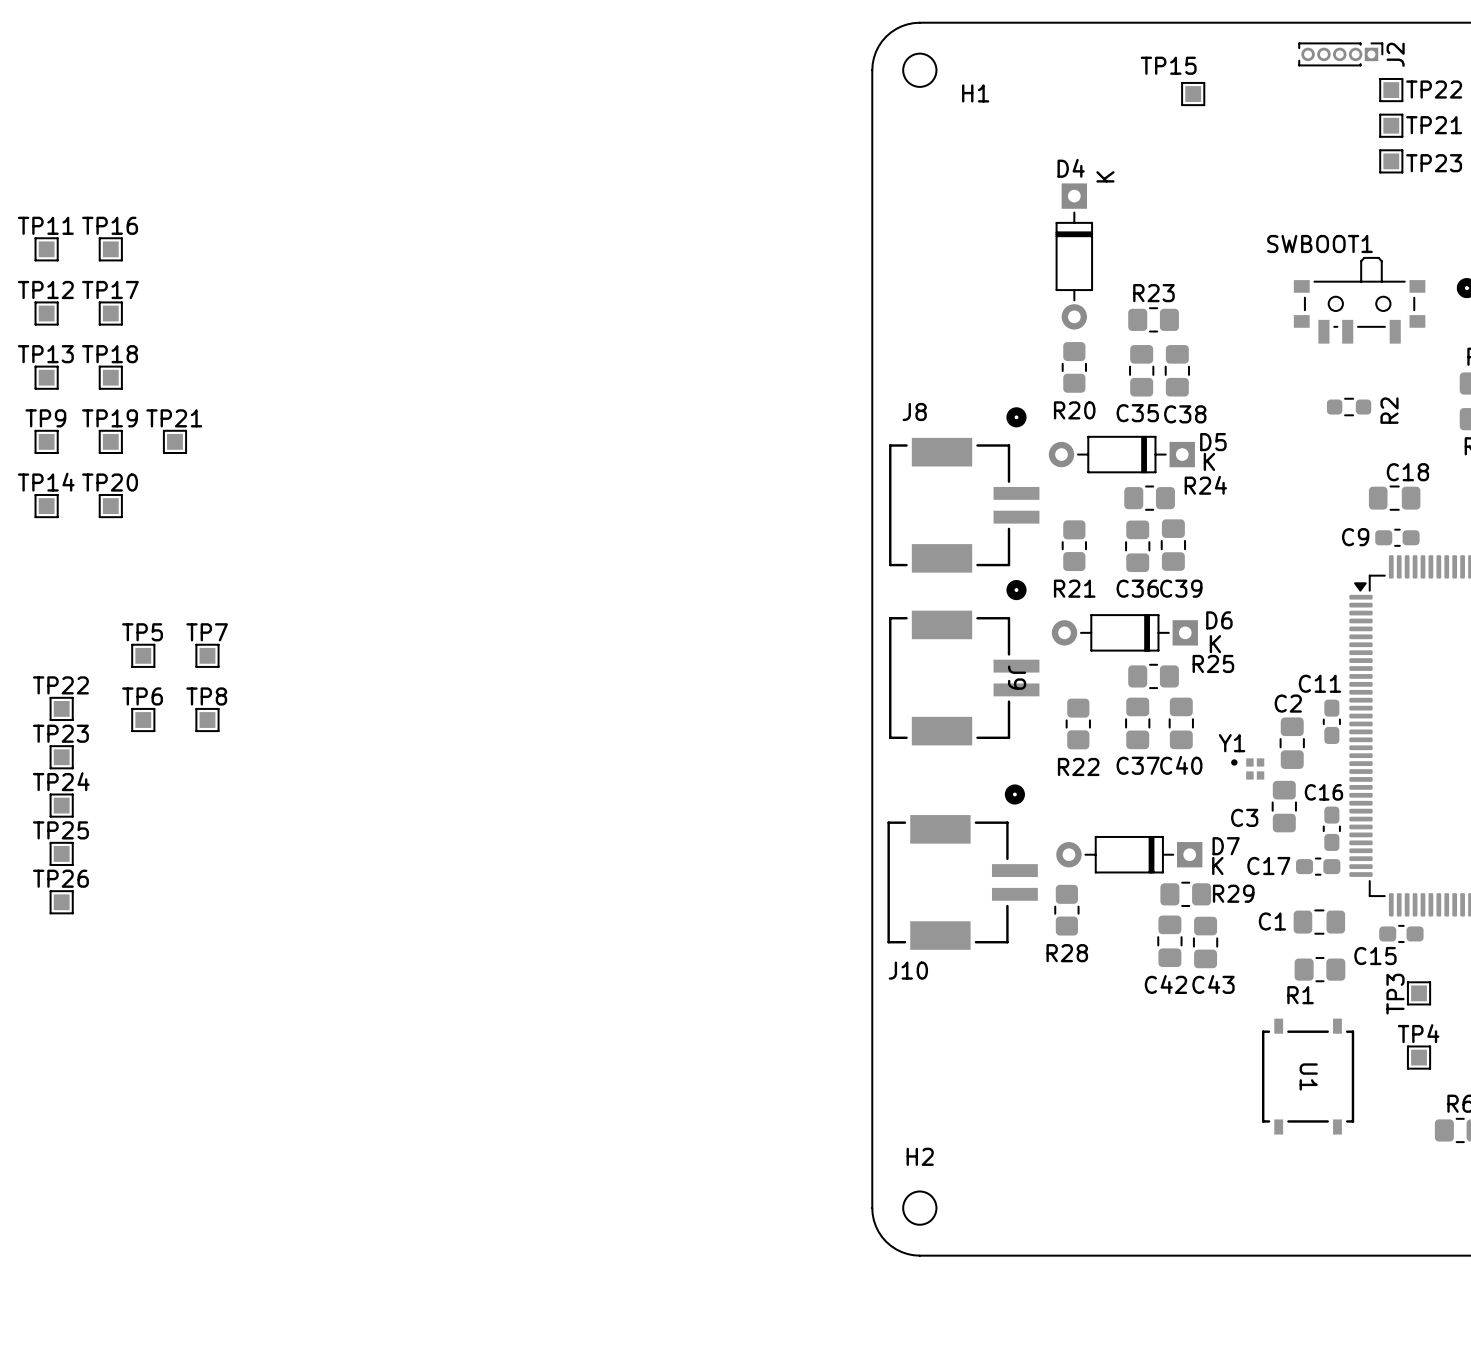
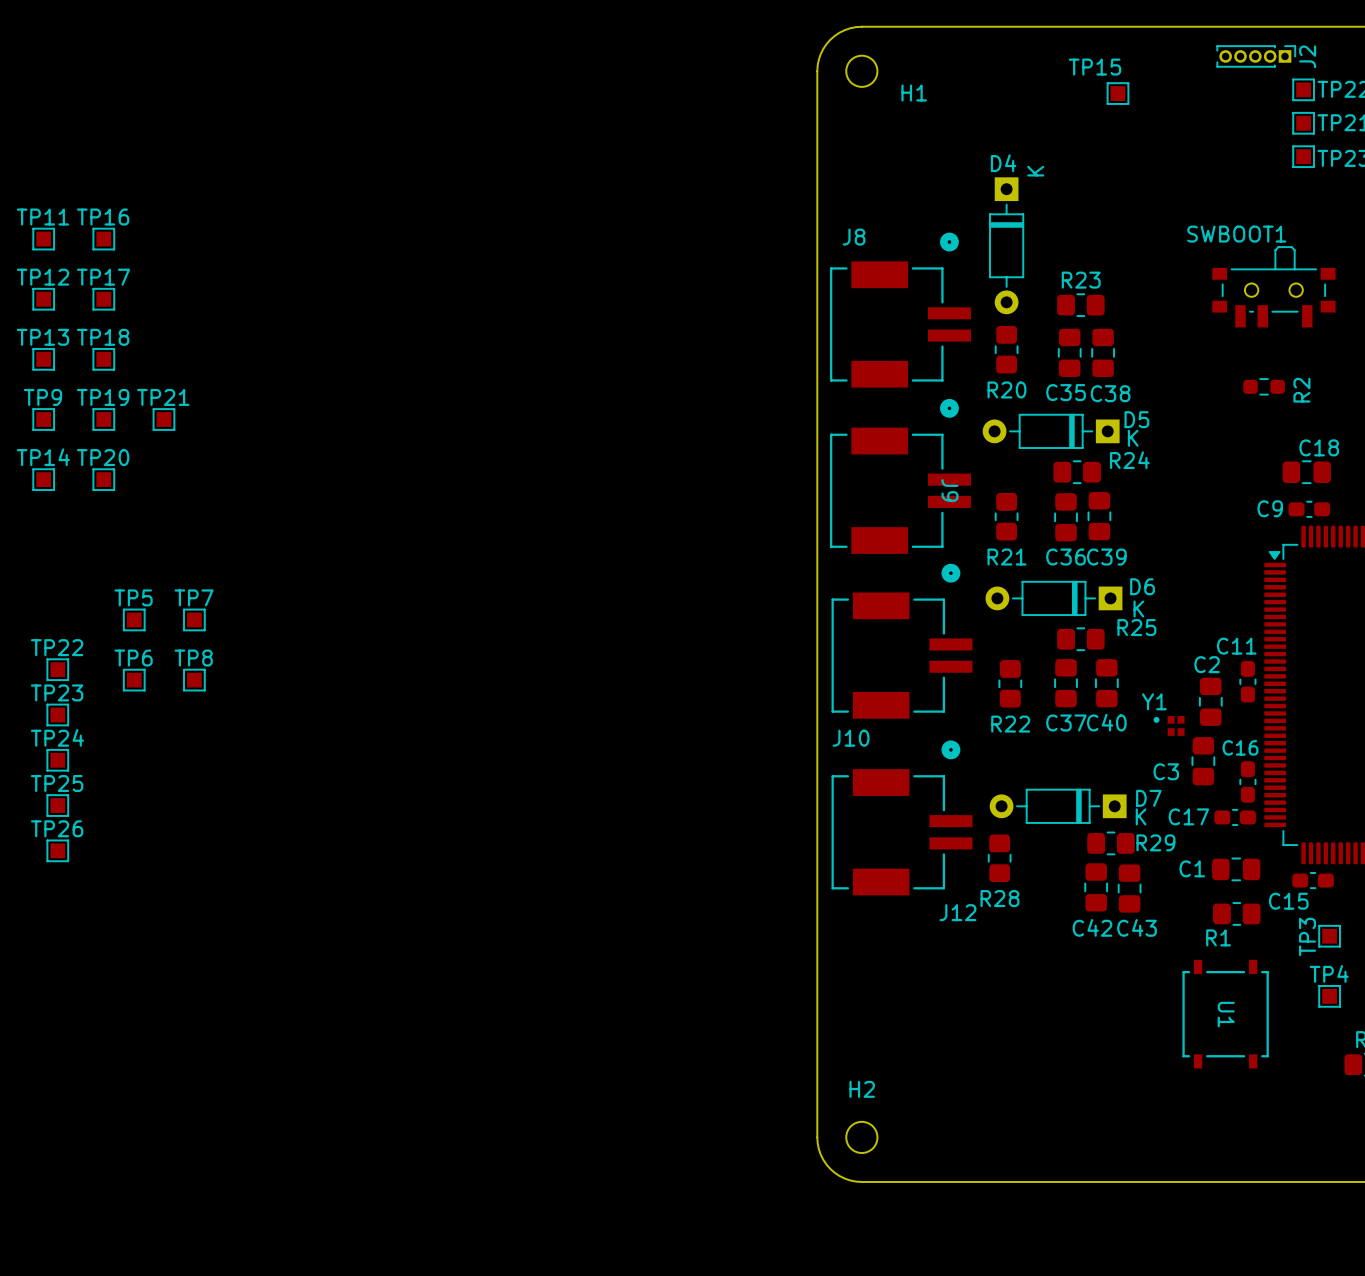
J8 position: (964, 489) -> (900, 310)
J9 position: (964, 662) -> (900, 476)
J10: none -> (901, 641)
J10 name: J10 (908, 970) -> J12 (958, 912)

